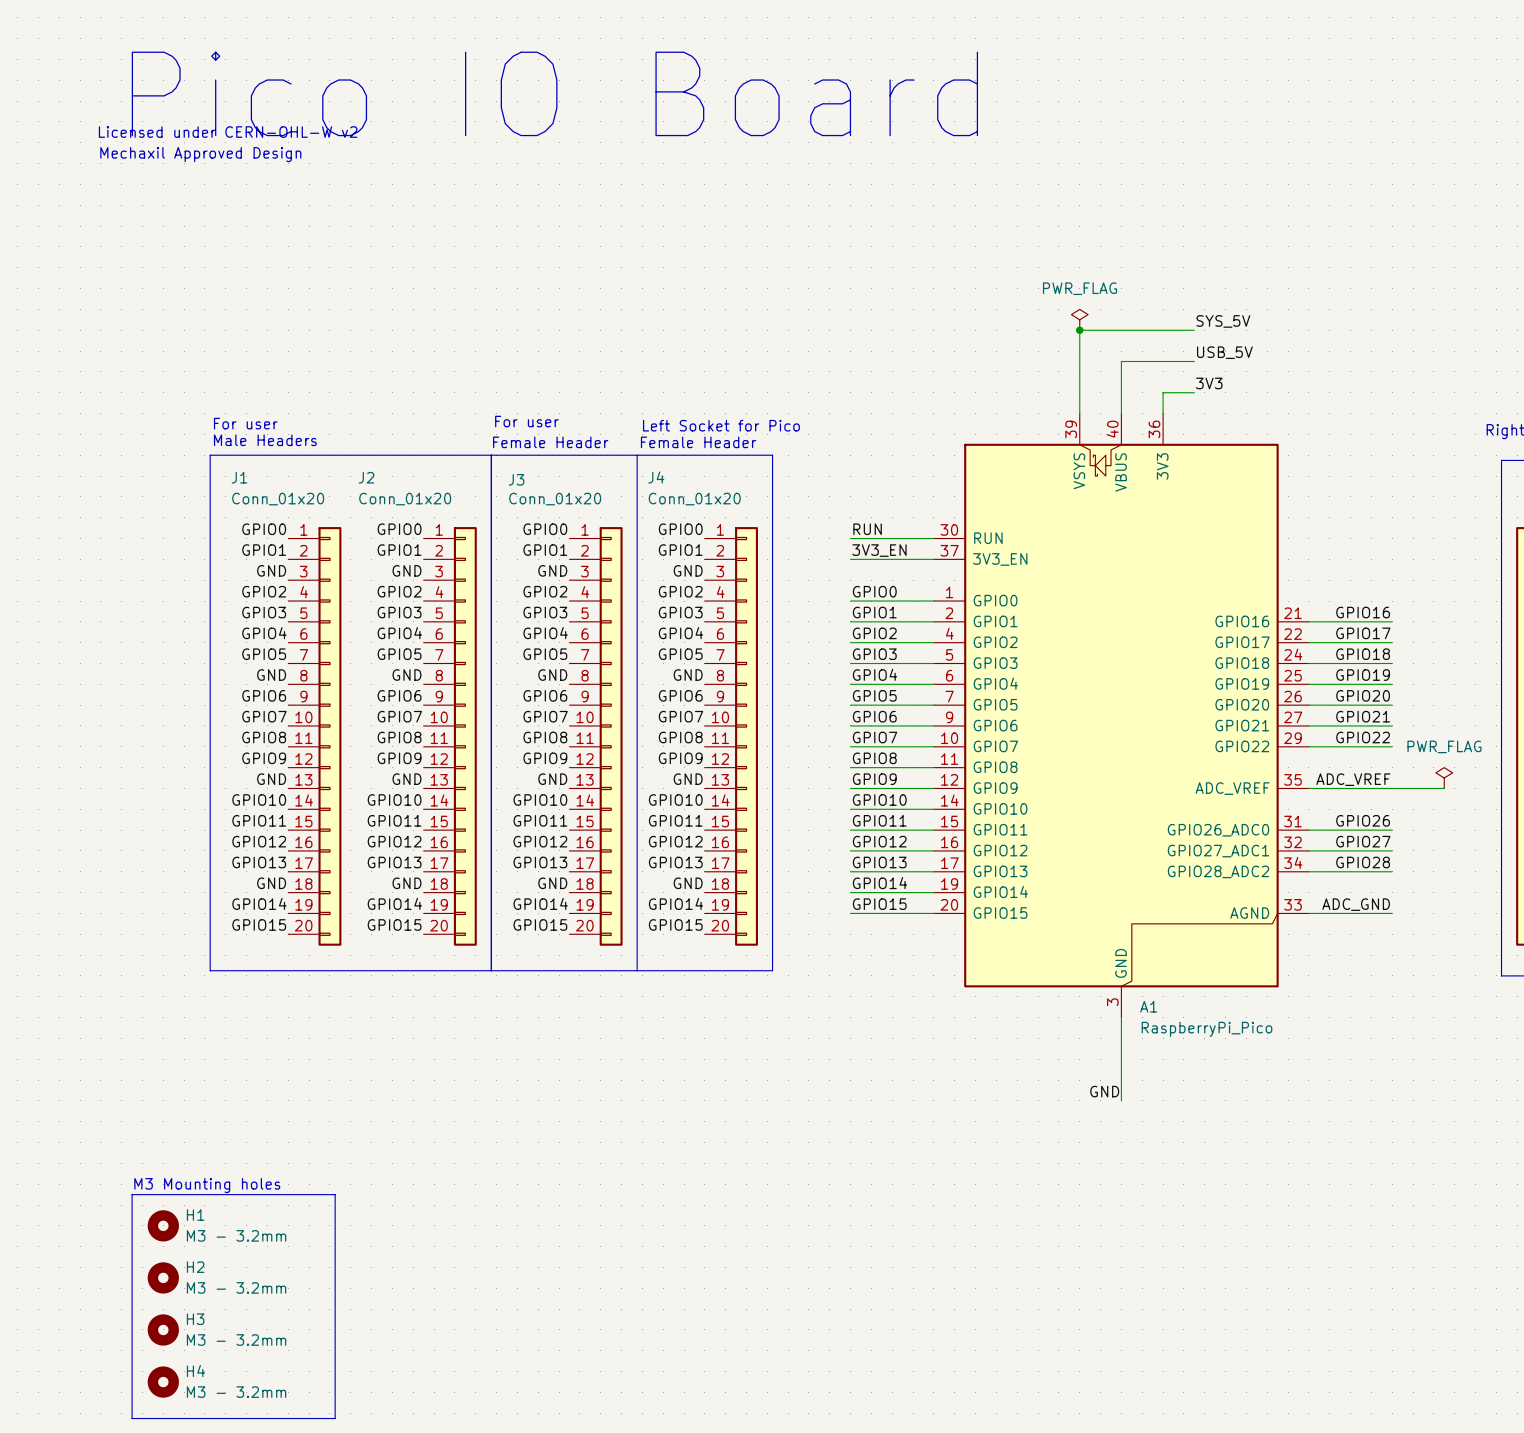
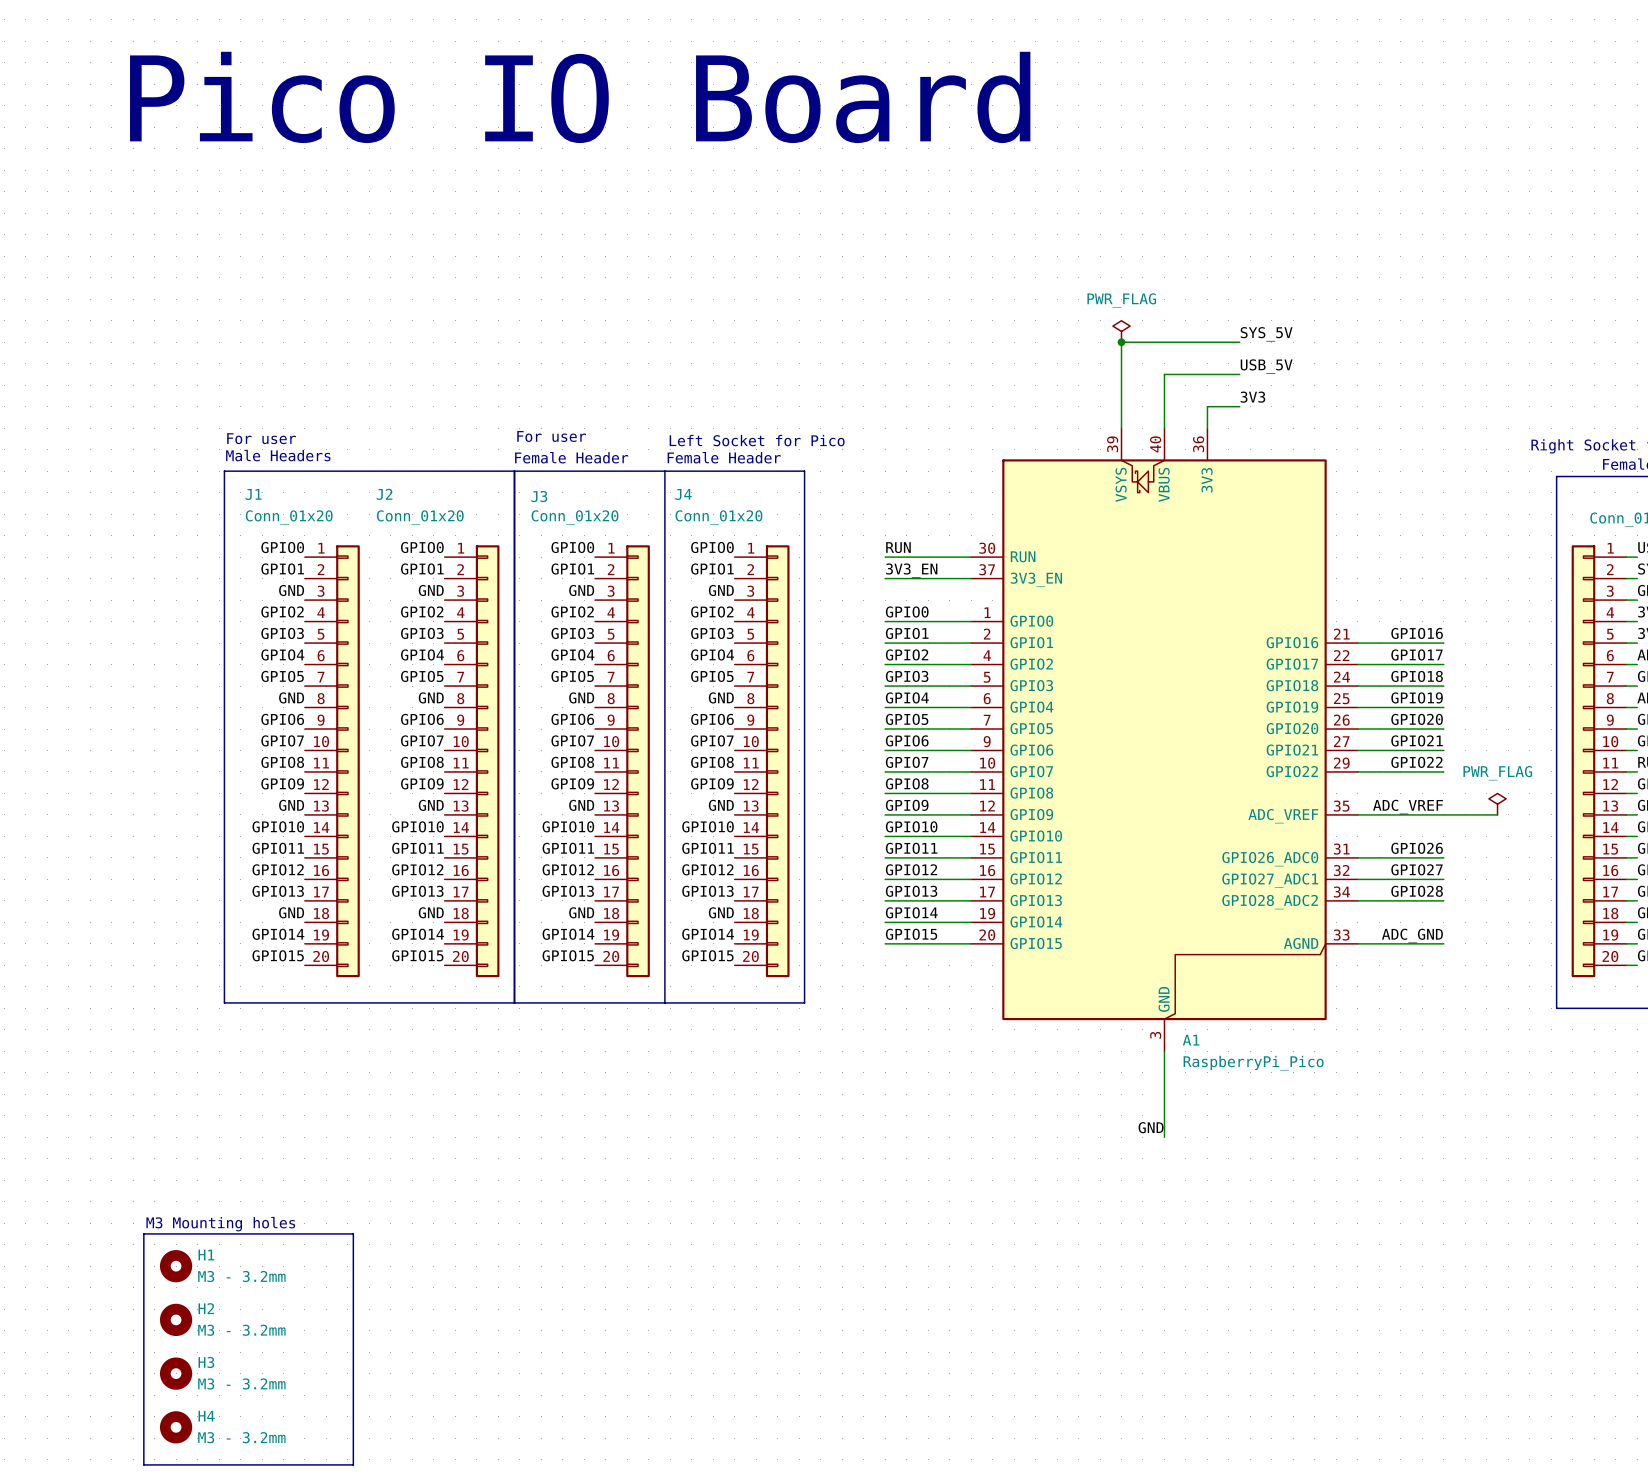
text: Licensed under CERN-OHL-W v2 (228, 132) -> none
text: Mechaxil Approved Design (200, 154) -> none

